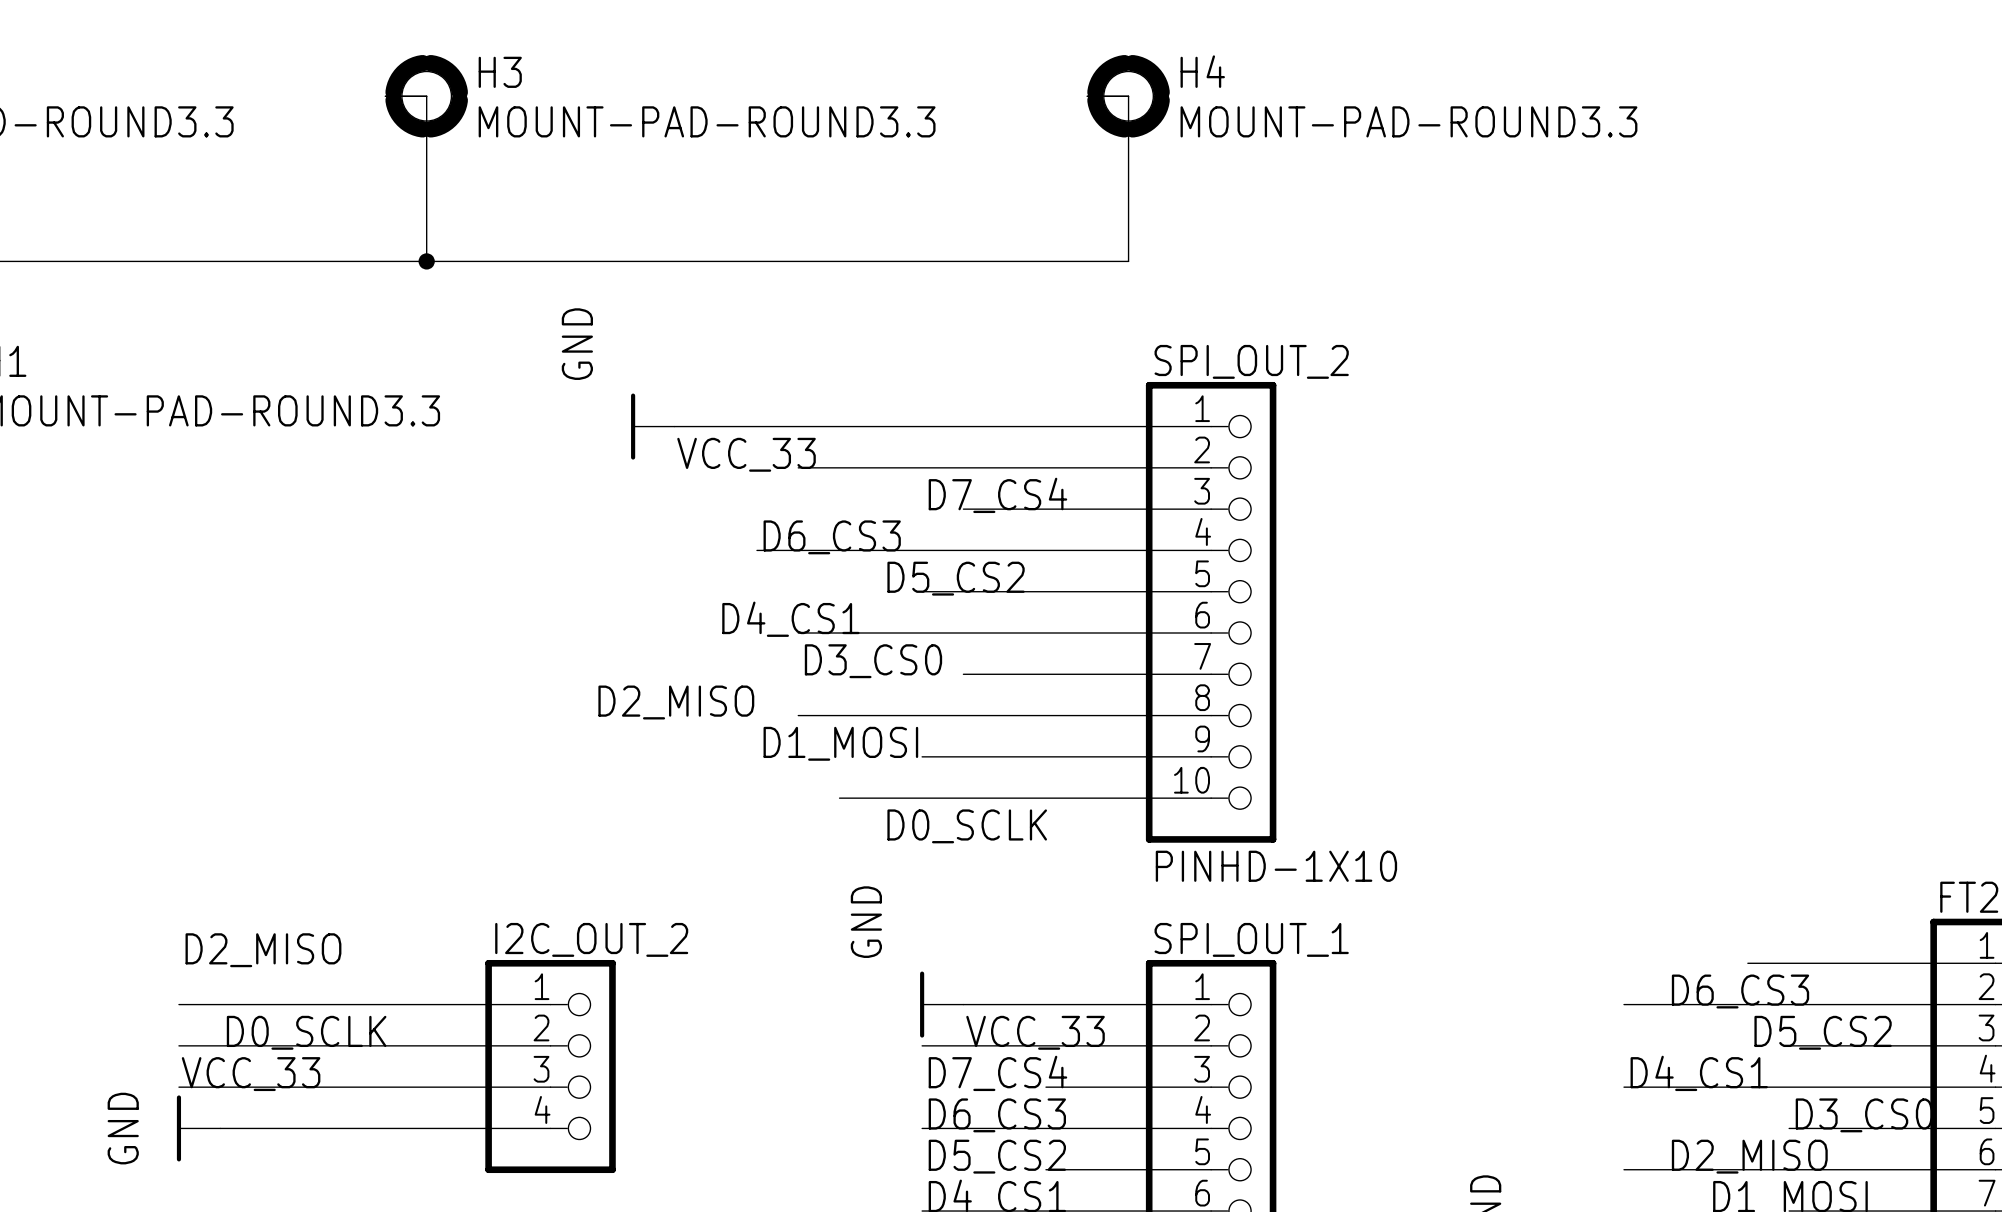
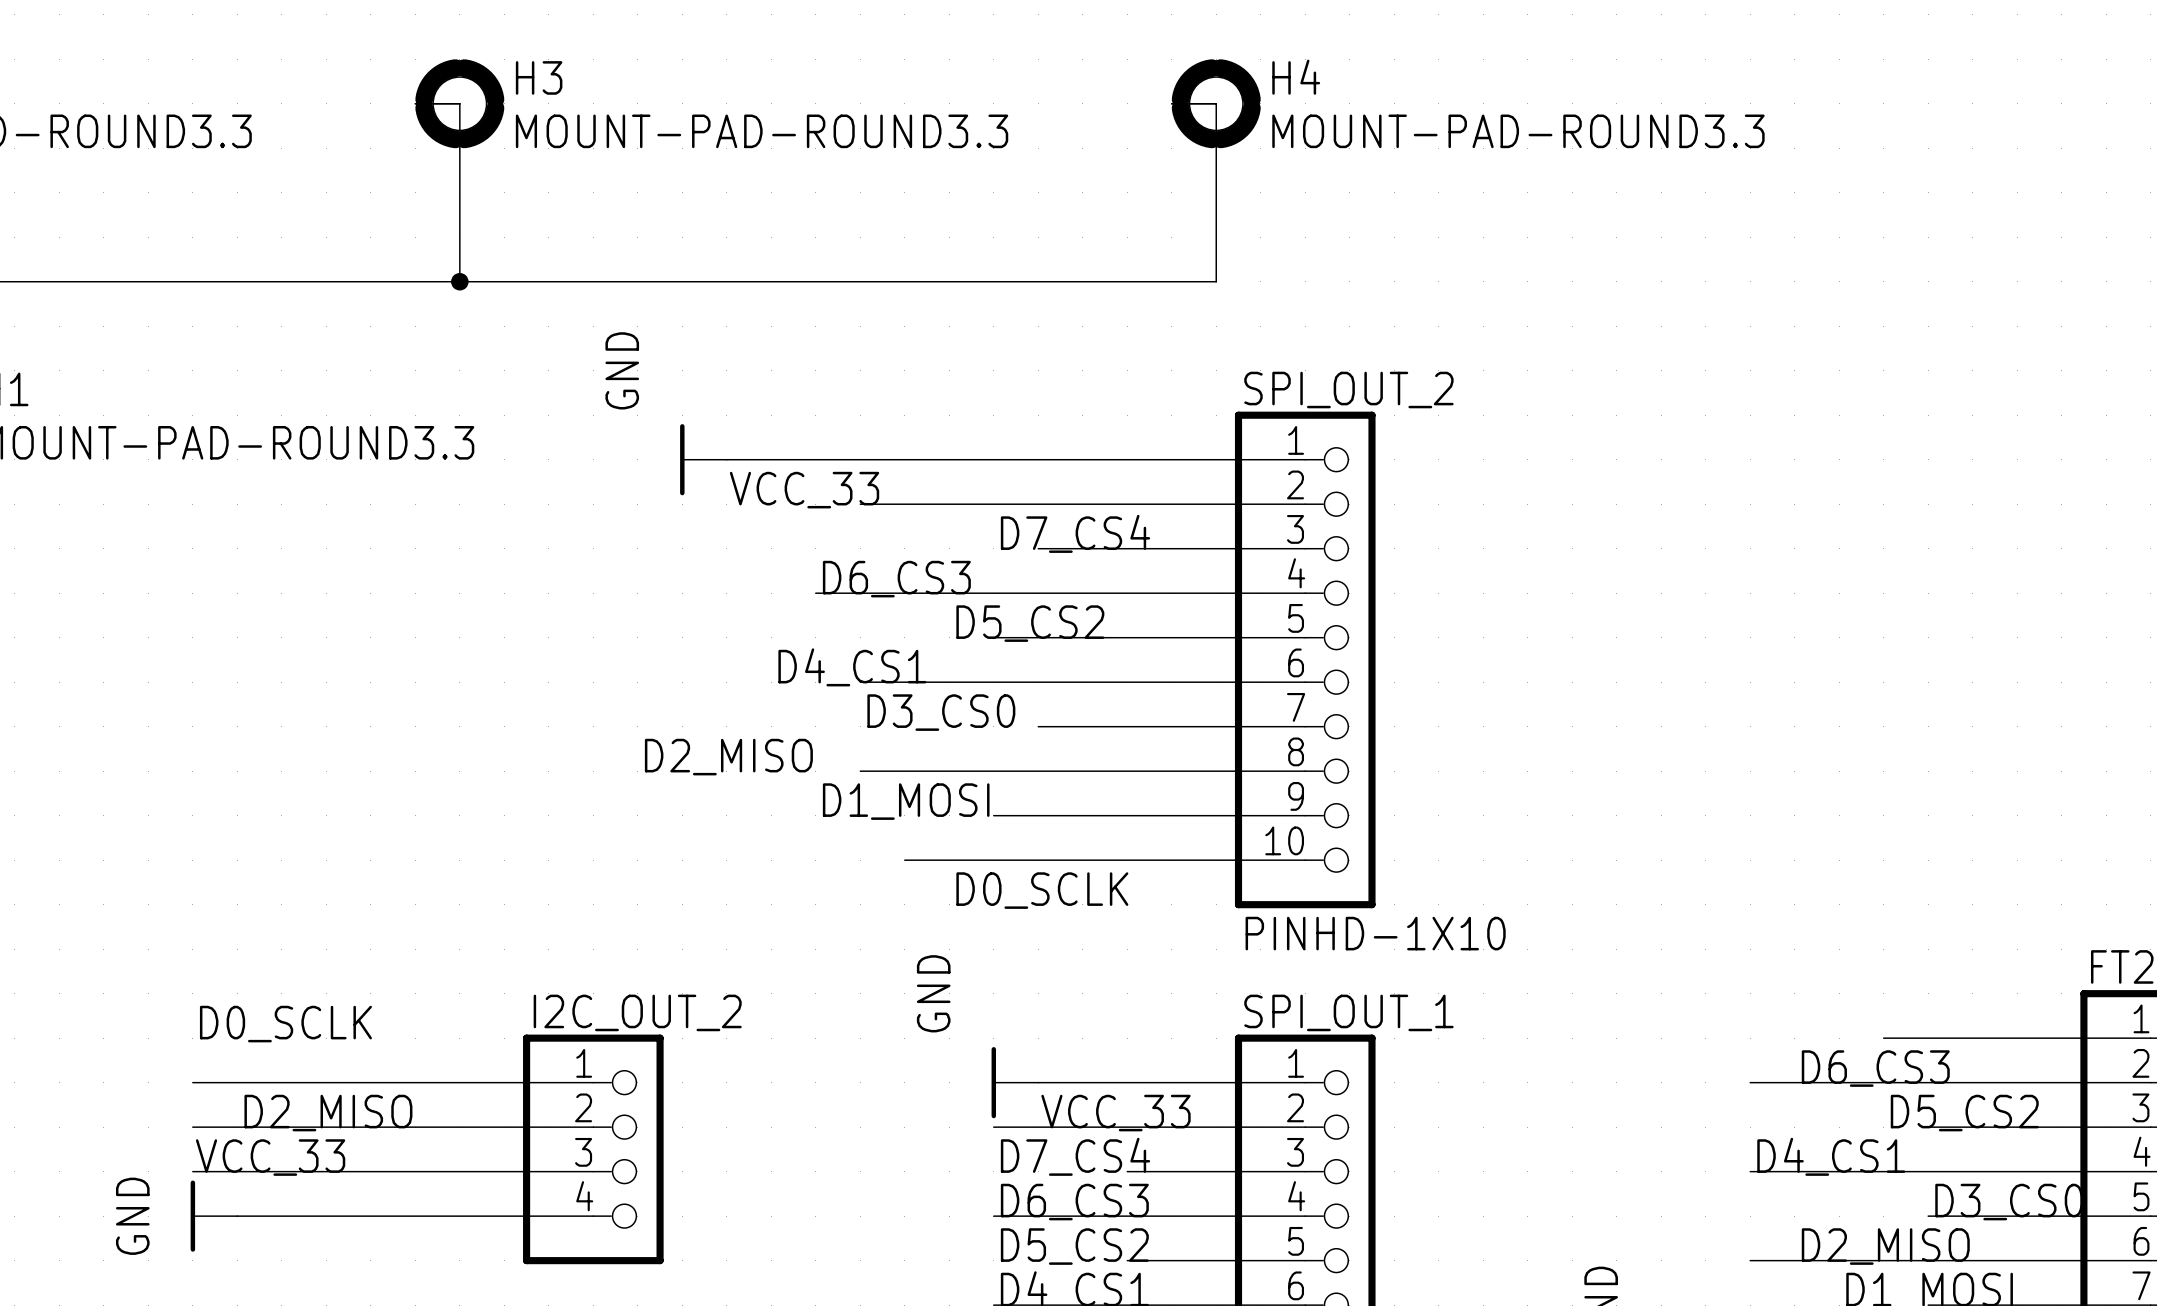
label: D2_MISO (263, 950) -> D0_SCLK (285, 1024)
label: D0_SCLK (306, 1032) -> D2_MISO (328, 1113)

